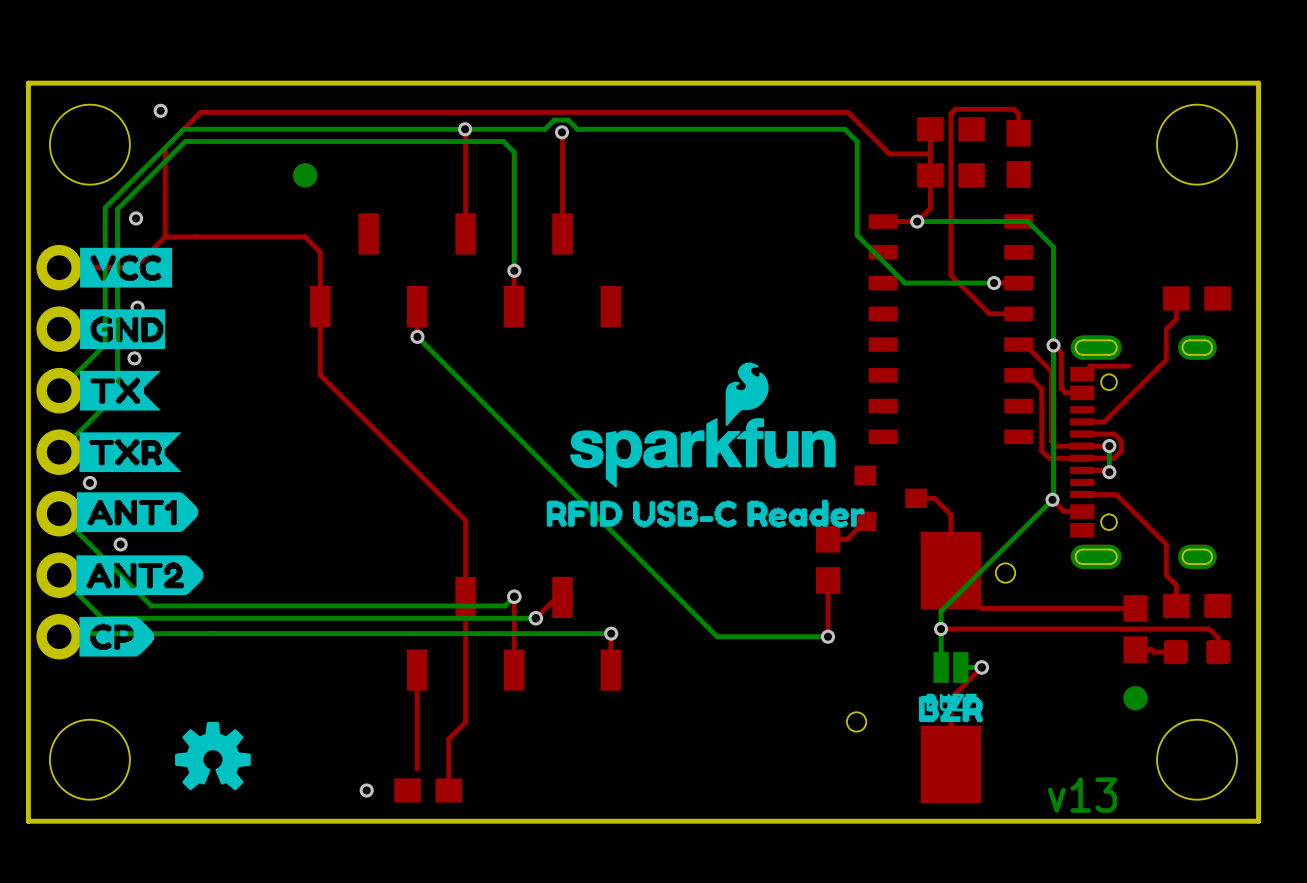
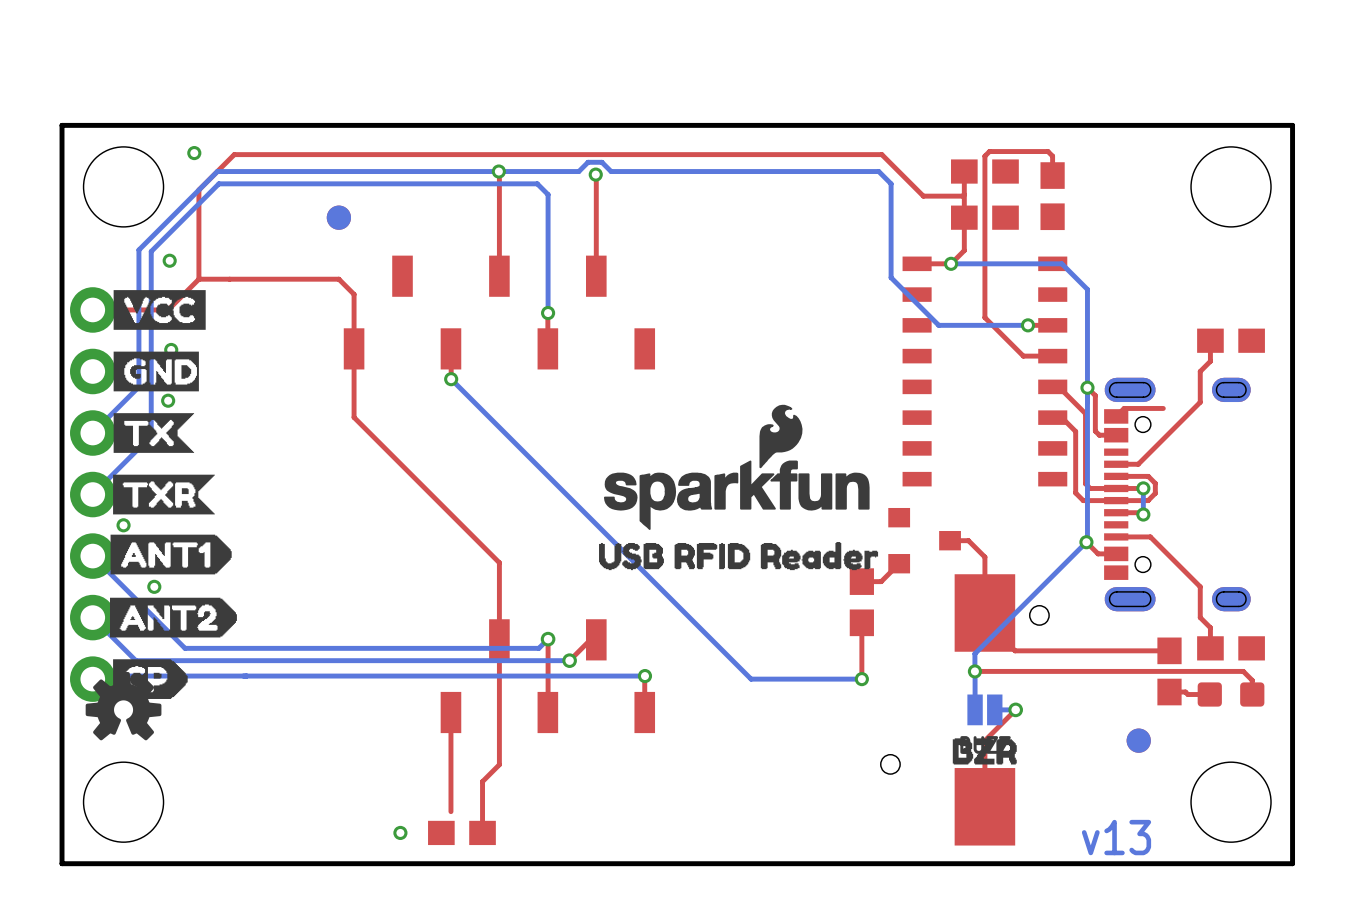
drawing shape: [546, 499, 865, 528] -> [599, 542, 879, 571]
part position: (1135, 698) -> (1138, 740)
drawing position: (212, 756) -> (123, 706)

